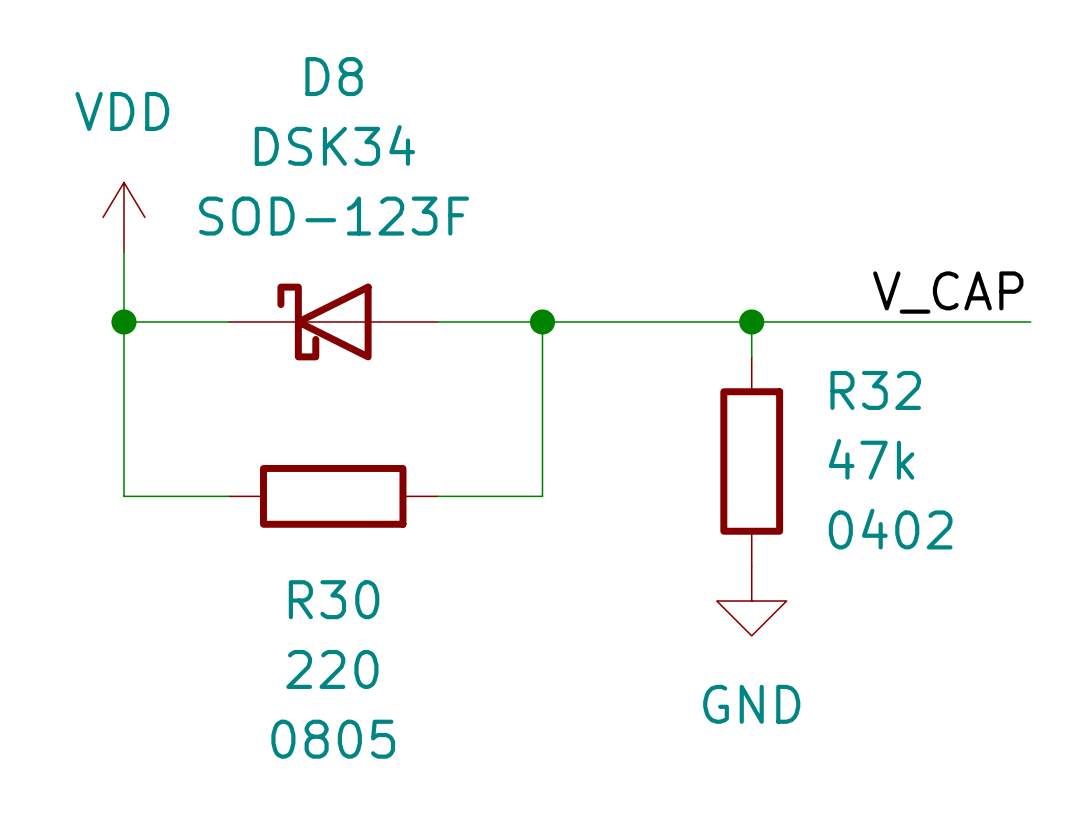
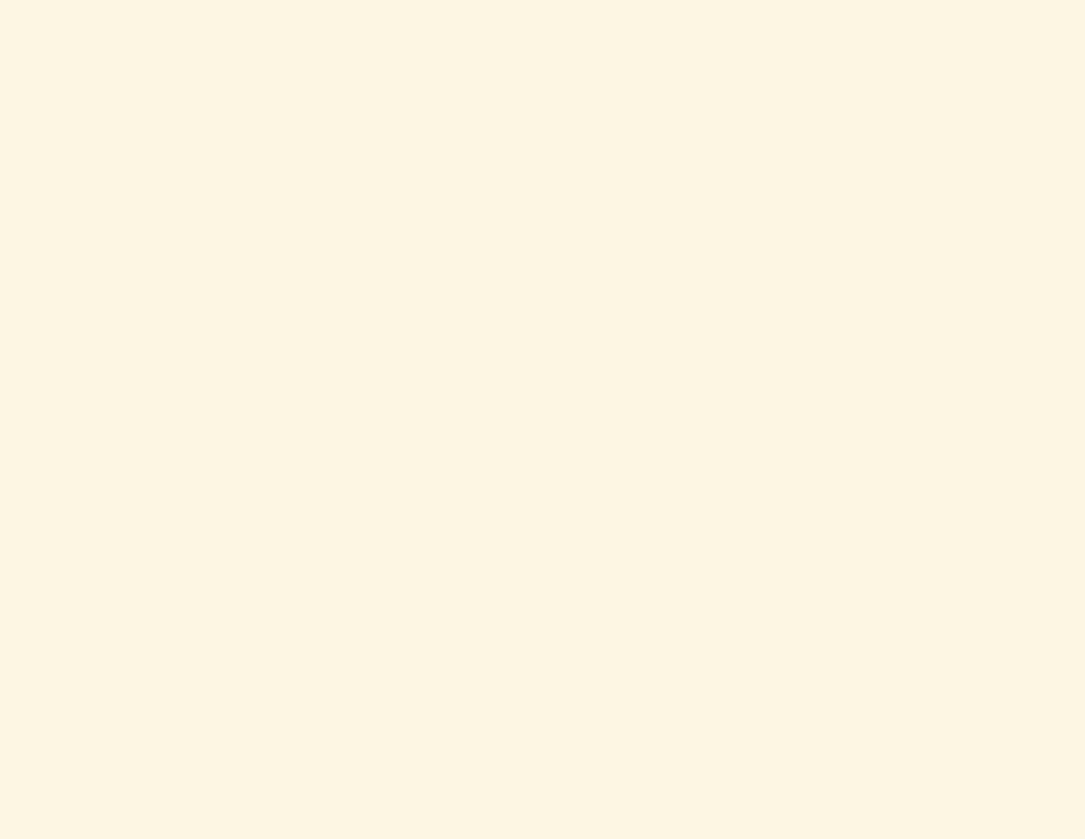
power symbol: VDD (123, 217) -> none
wire: (123, 252) (123, 496) (228, 496) -> none
label: V_CAP (948, 292) -> none
wire: (123, 322) (228, 322) -> none
junction: (123, 322) -> none
D8: DSK34 (333, 322) -> none
wire: (437, 322) (1030, 322) -> none
wire: (542, 322) (542, 496) (437, 496) -> none
junction: (542, 322) -> none
wire: (751, 322) (751, 356) -> none
junction: (751, 322) -> none
R32: 47k (751, 461) -> none
R30: 220 (333, 496) -> none
power symbol: GND (751, 600) -> none

